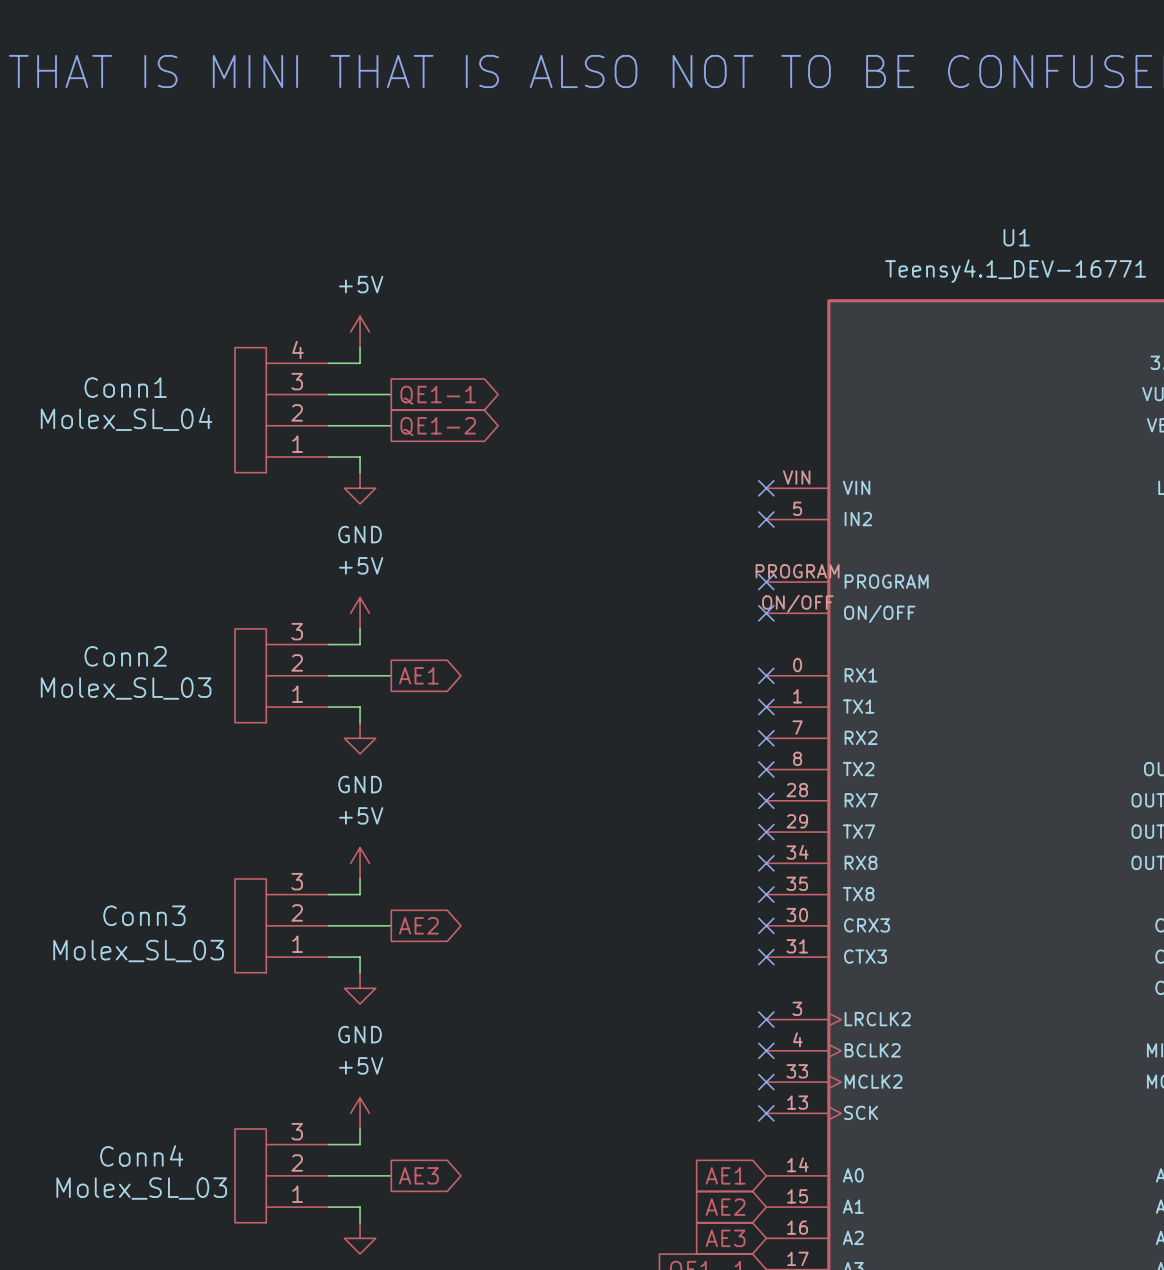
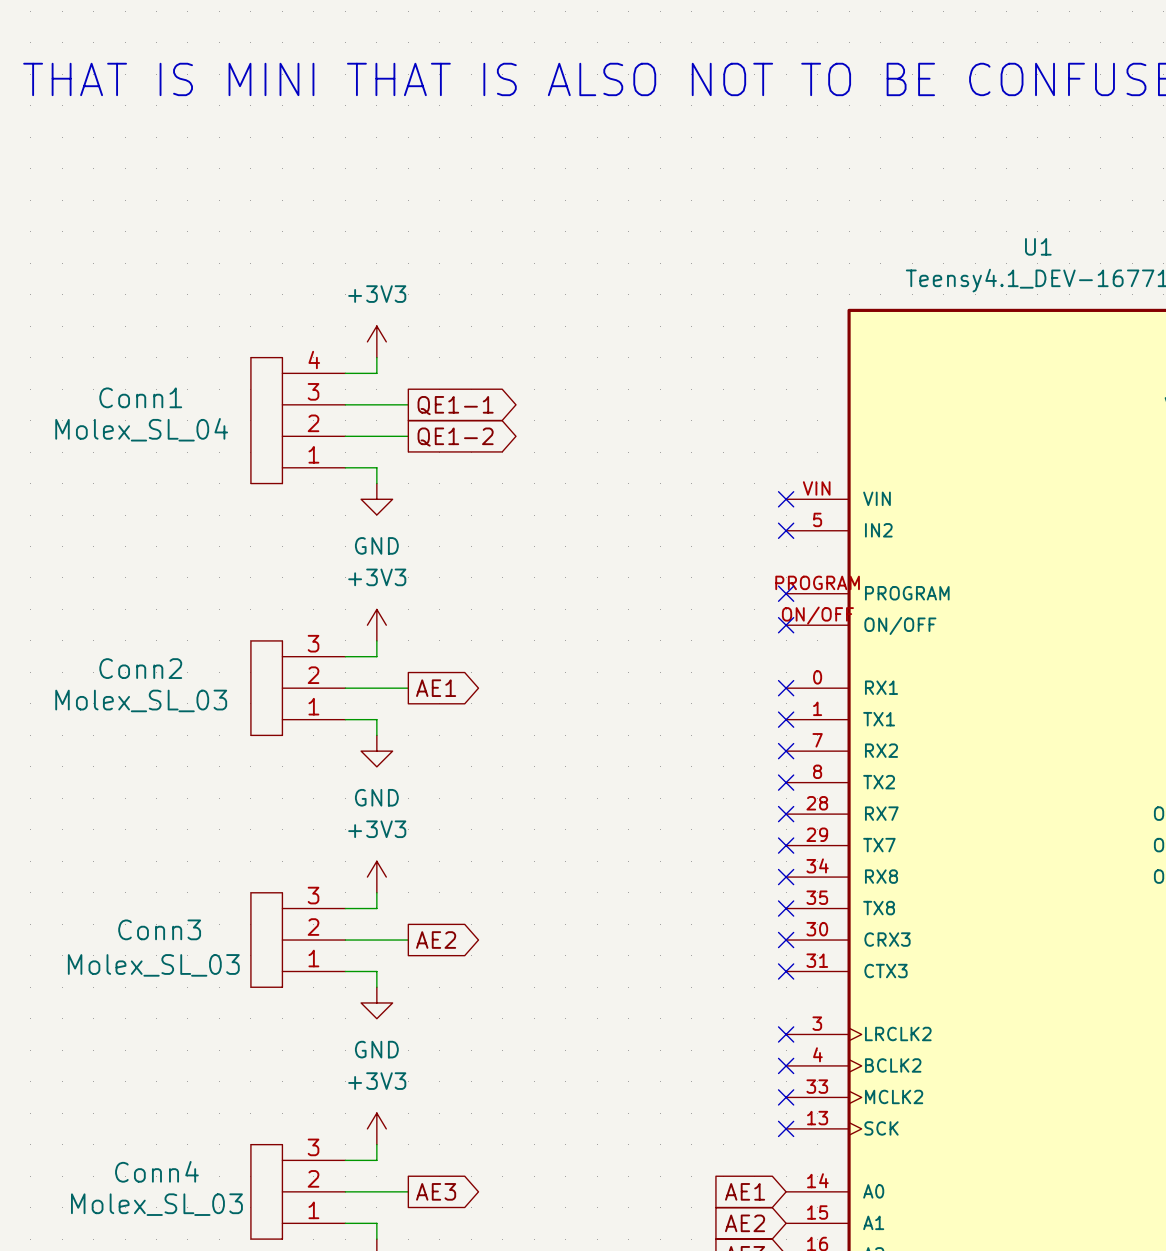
power symbol: +5V (360, 332) -> +3V3 (376, 341)
power symbol: +5V (360, 613) -> +3V3 (376, 625)
power symbol: +5V (360, 863) -> +3V3 (376, 877)
power symbol: +5V (360, 1113) -> +3V3 (376, 1128)

